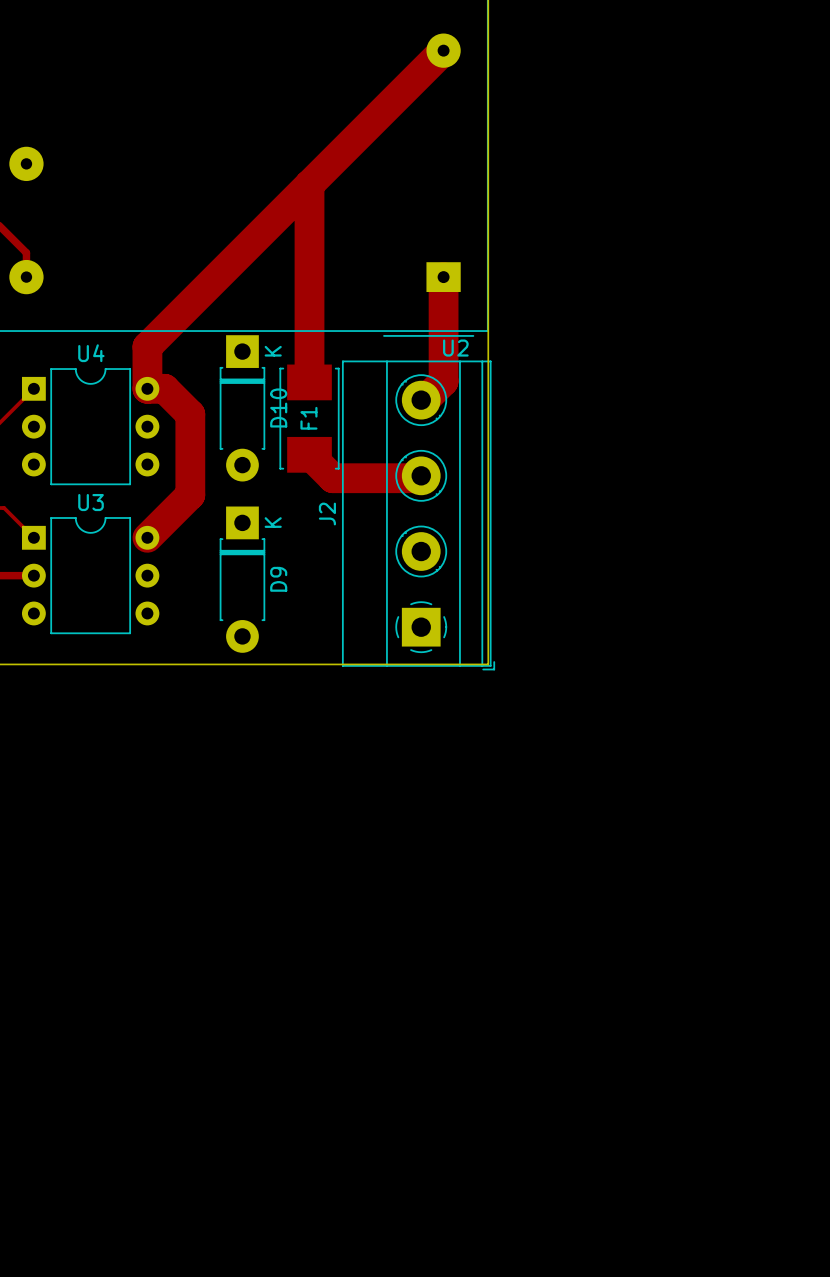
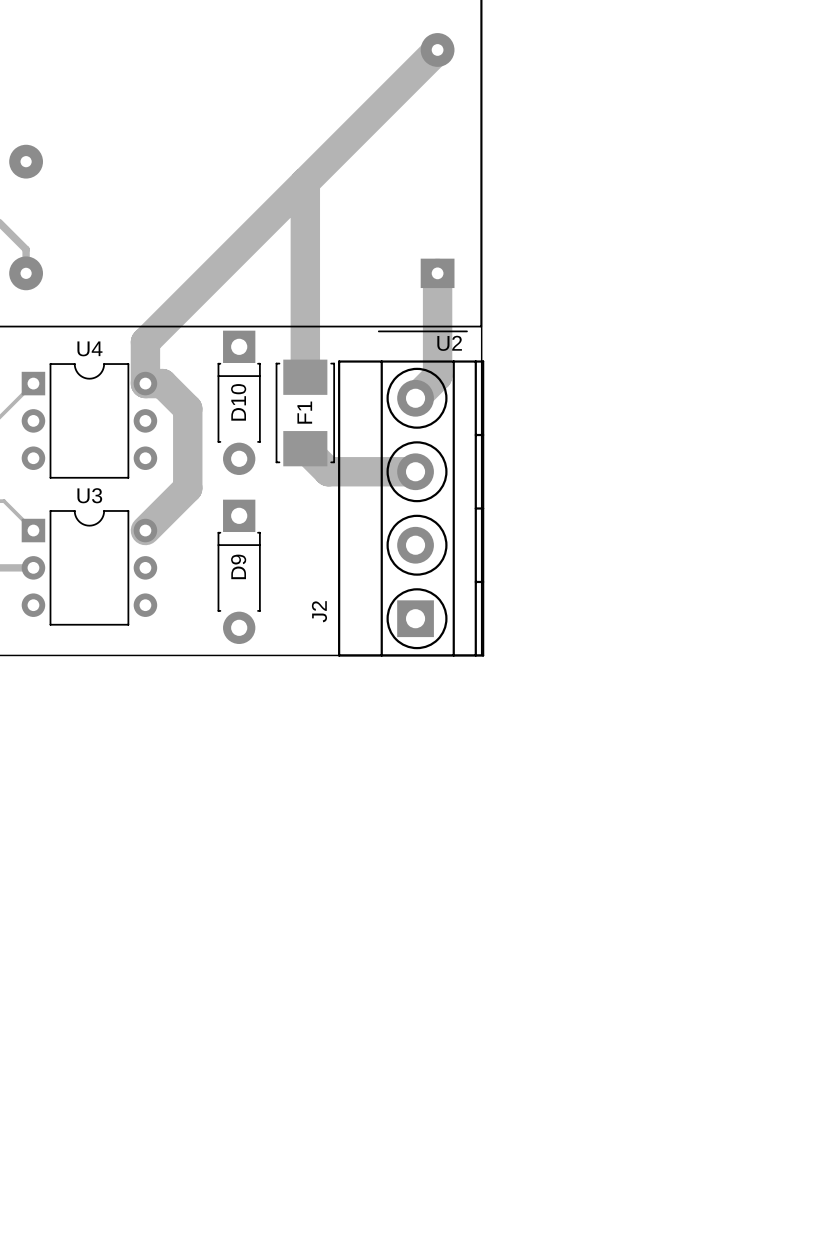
D10 footprint: [219, 335, 266, 482] -> [217, 330, 261, 475]
J2 footprint: [341, 360, 496, 671] -> [338, 360, 485, 657]
D10 name position: D10 (278, 407) -> D10 (238, 402)
D9 footprint: [219, 506, 266, 653] -> [217, 499, 261, 644]
J2 name position: J2 (327, 514) -> J2 (319, 611)
D9 name position: D9 (278, 579) -> D9 (238, 566)

